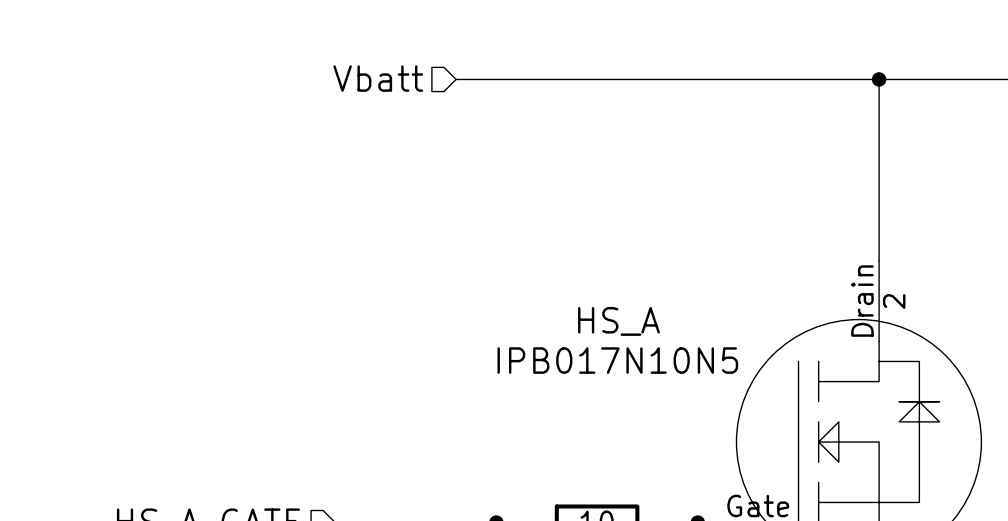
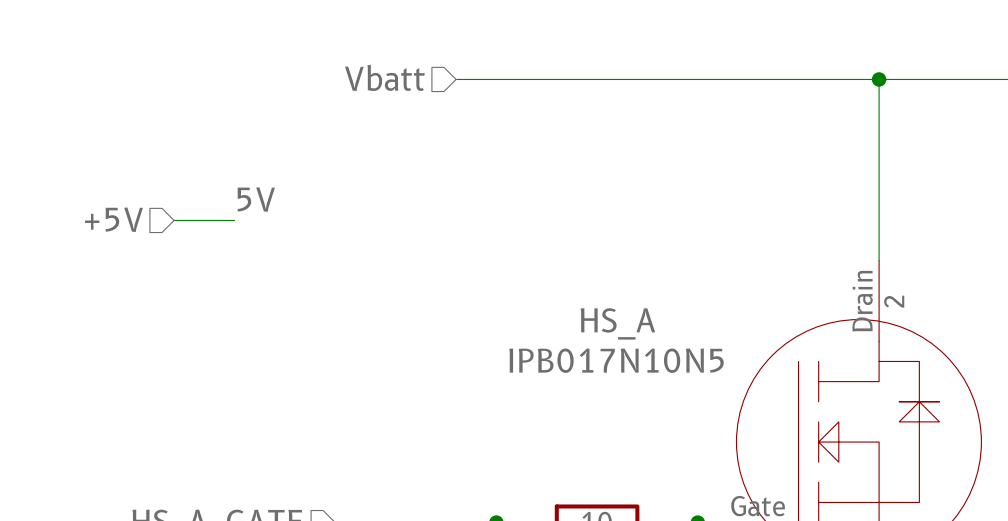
label: none -> 5V (256, 199)
hierarchical label: none -> +5V (113, 219)
wire: none -> (174, 220) (234, 220)

